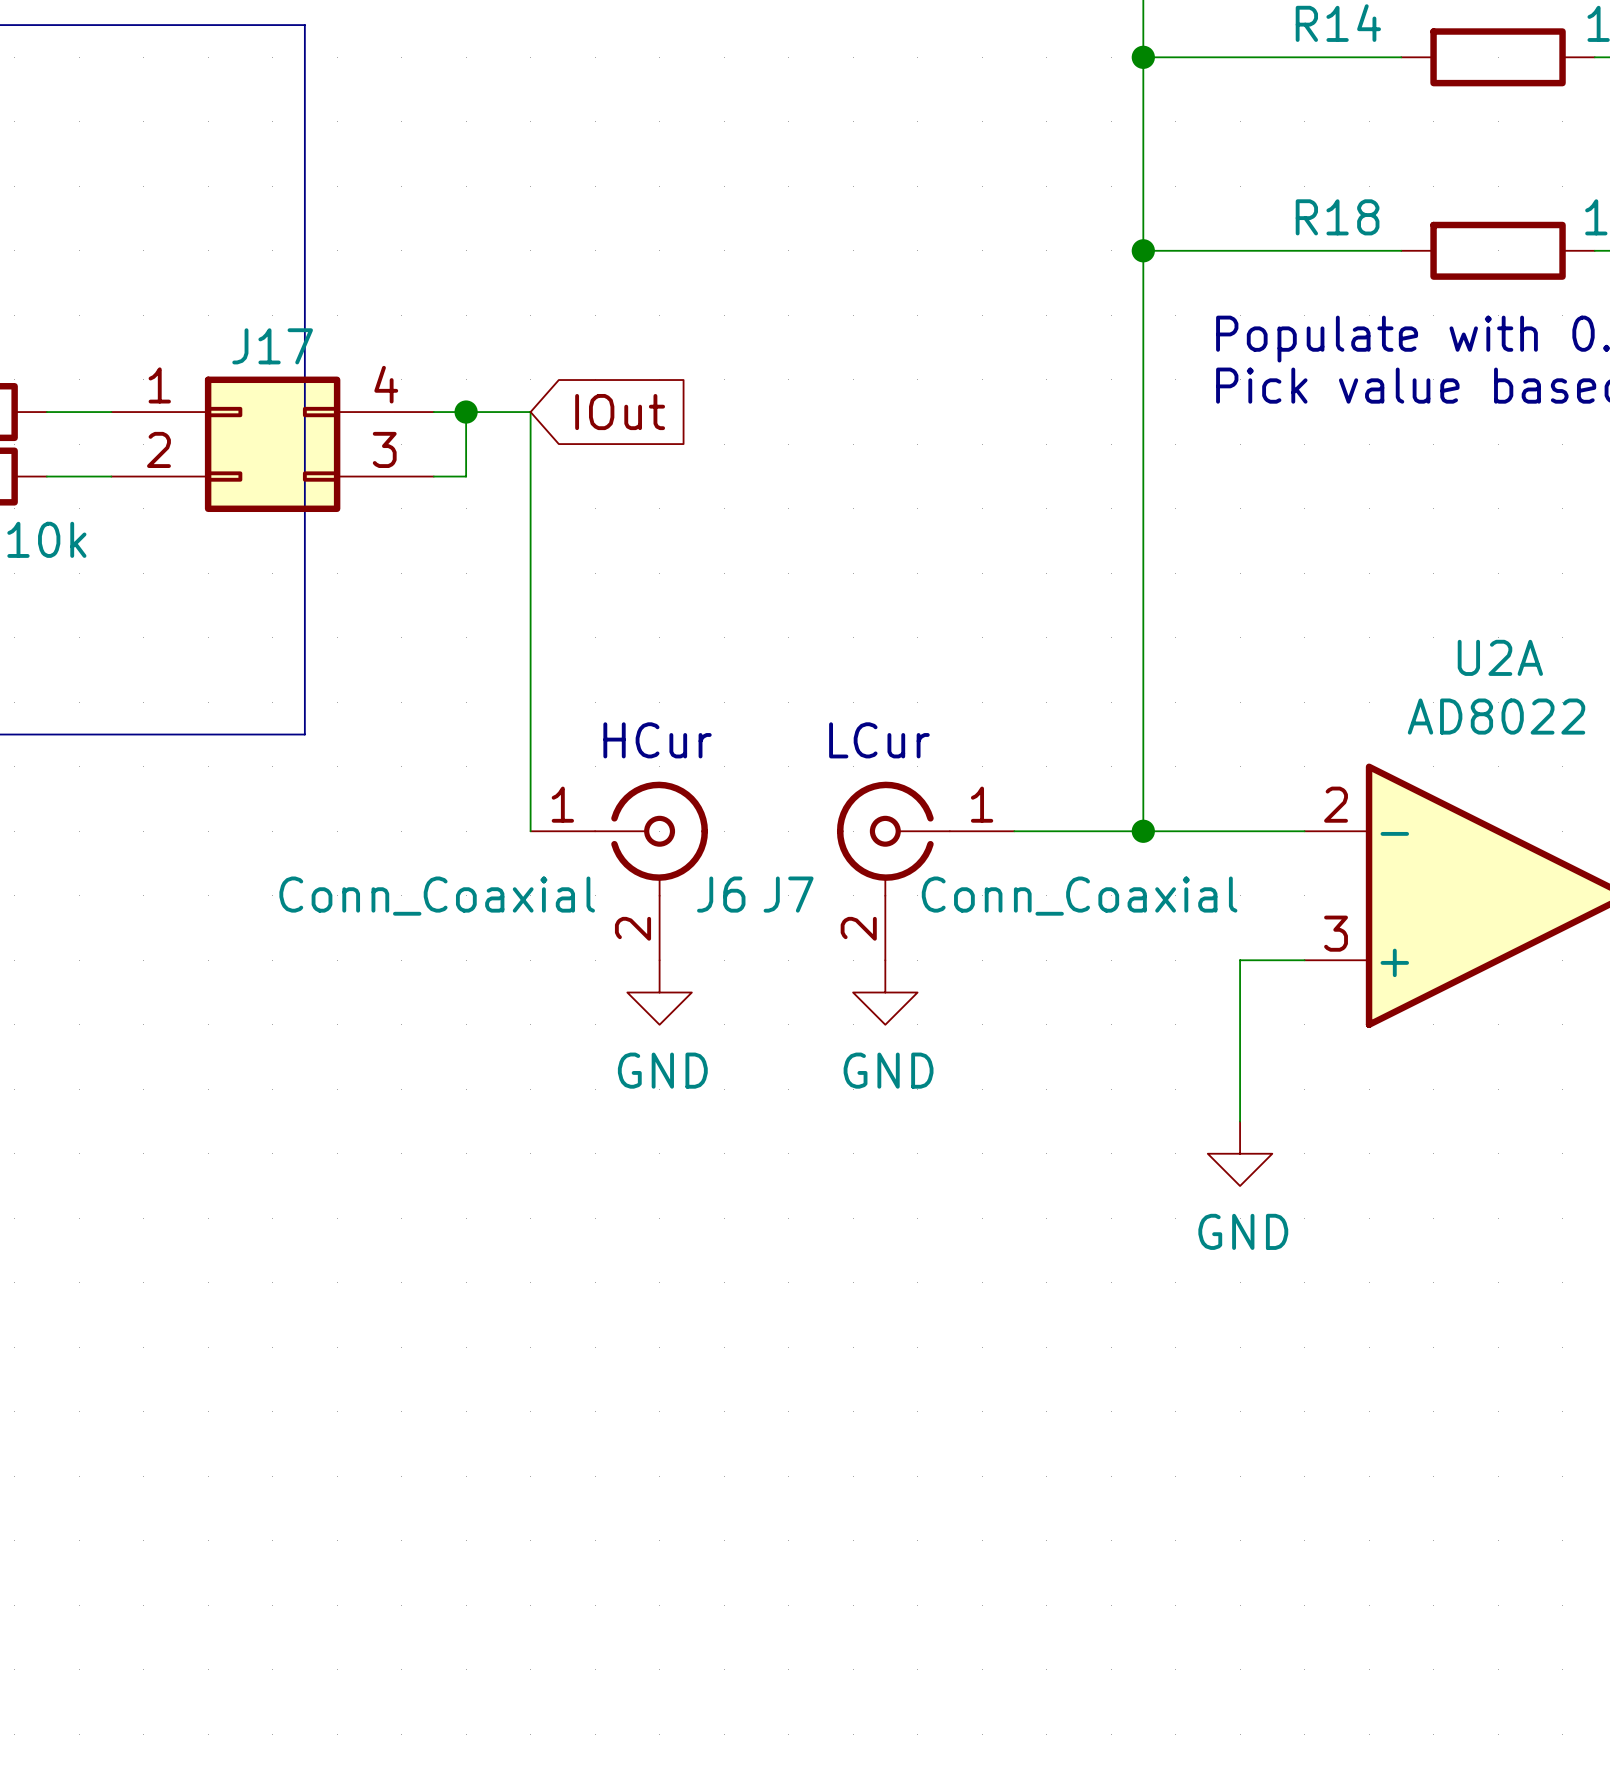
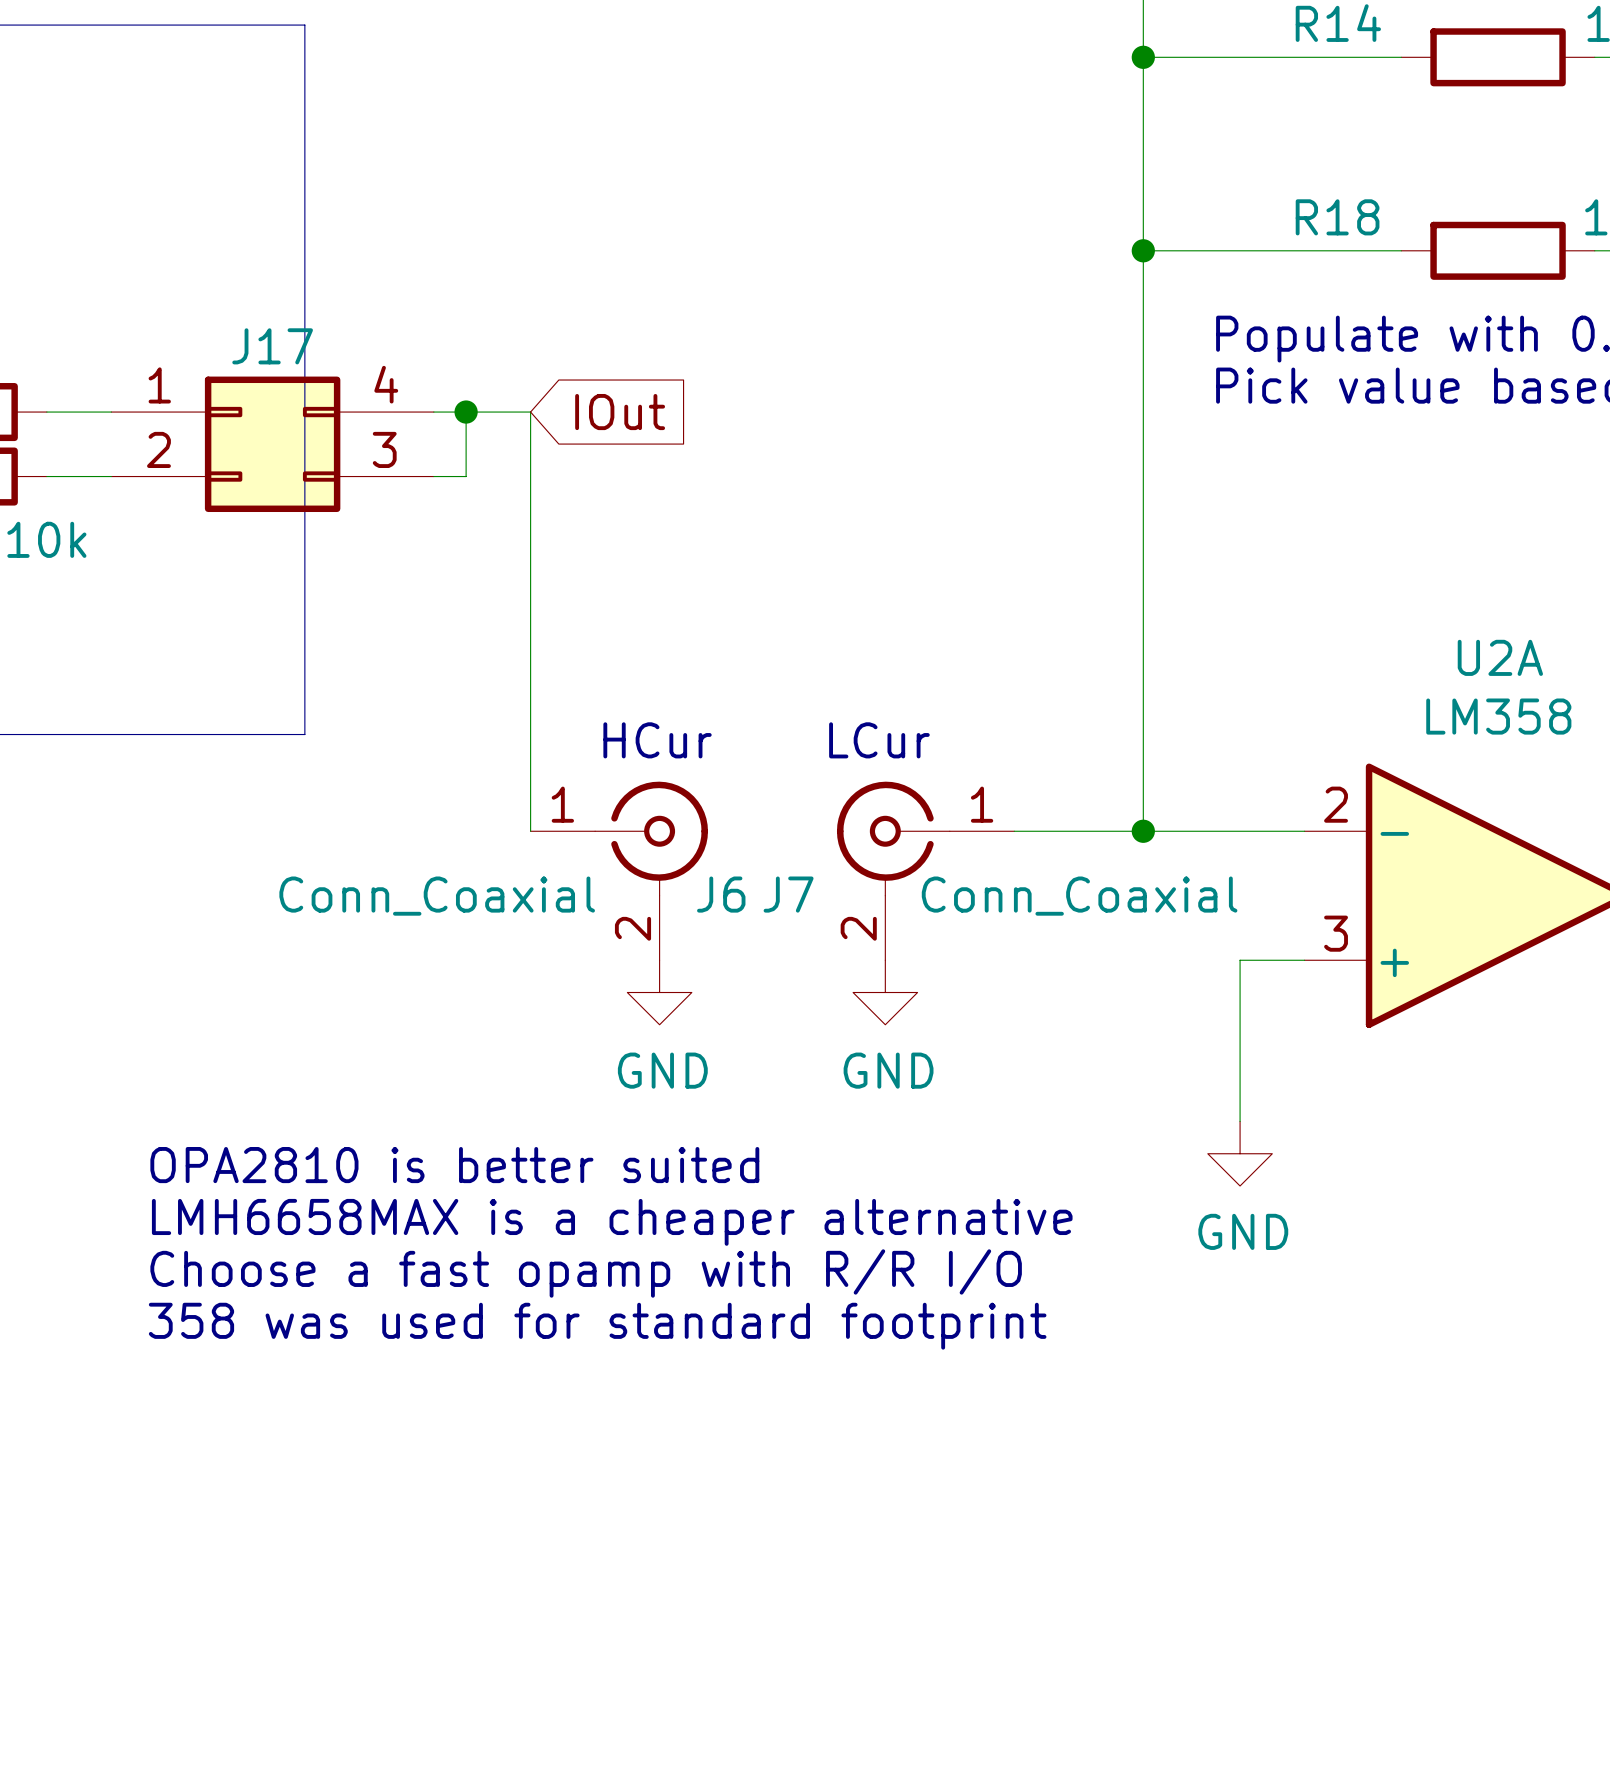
U2A value: AD8022 (1496, 716) -> LM358 (1498, 716)
text: none -> OPA2810 is better suited (454, 1165)
text: none -> LMH6658MAX is a cheaper alternative (612, 1222)
text: none -> Choose a fast opamp with R/R I/O (586, 1273)
text: none -> 358 was used for standard footprint (597, 1326)

